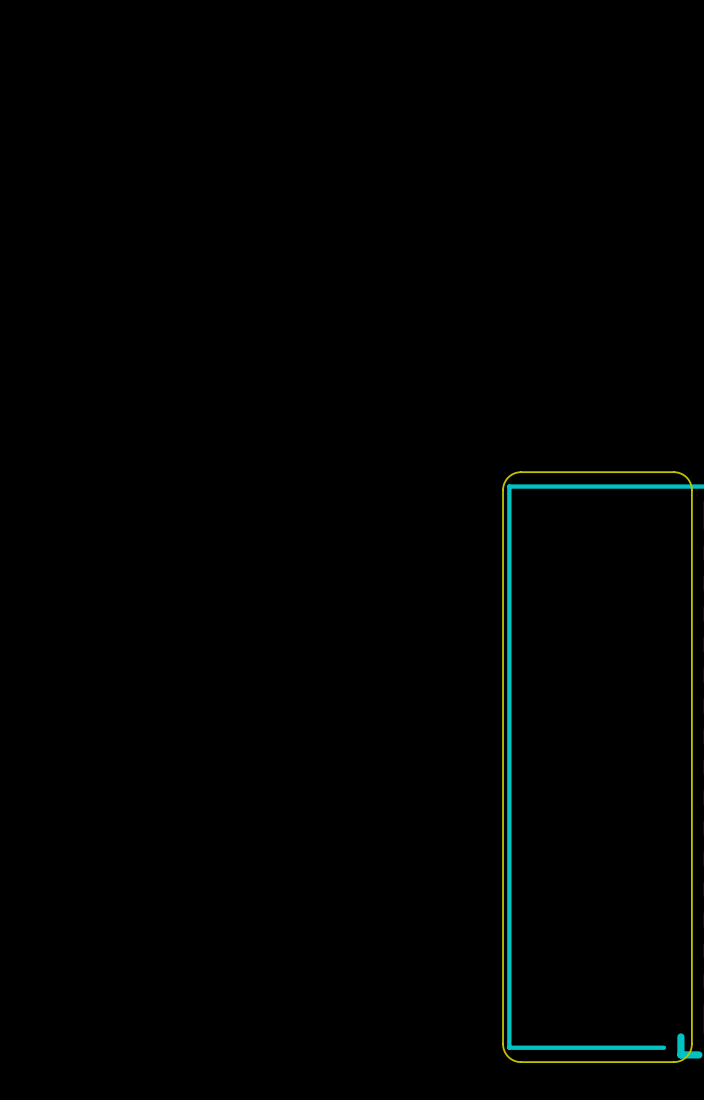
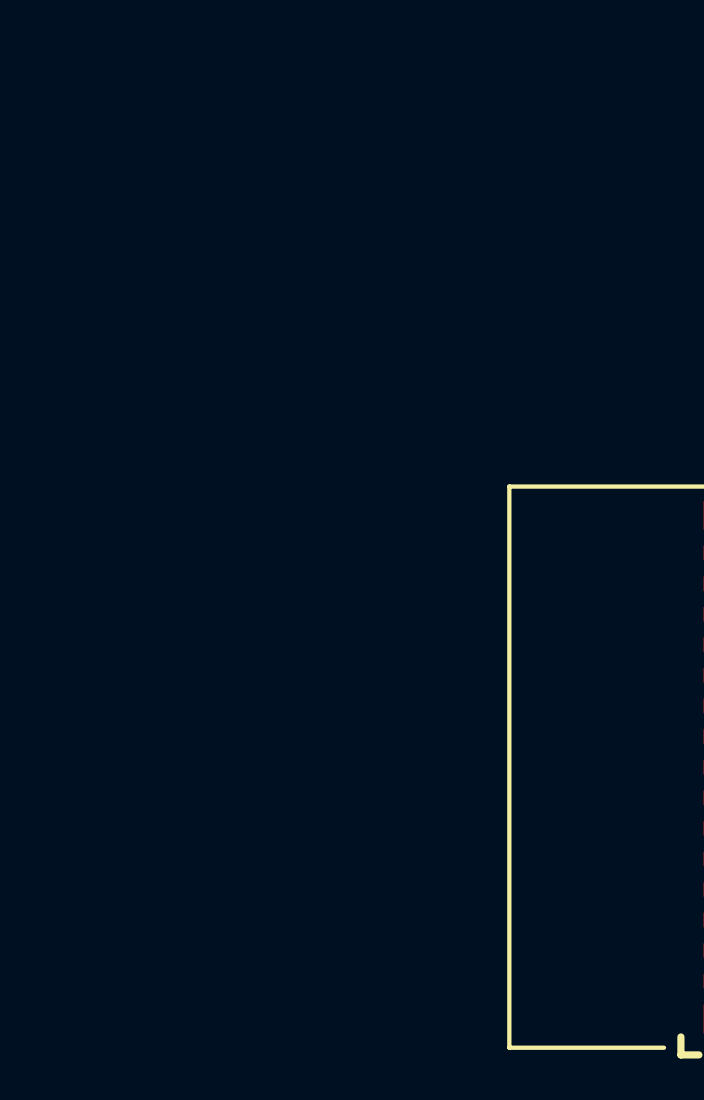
board edge: (521, 472) (676, 472) (686, 477) (691, 485) (691, 1044) (688, 1055) (678, 1061) (519, 1062) (508, 1056) (503, 1048) (503, 490) (508, 477) (521, 472) -> none

